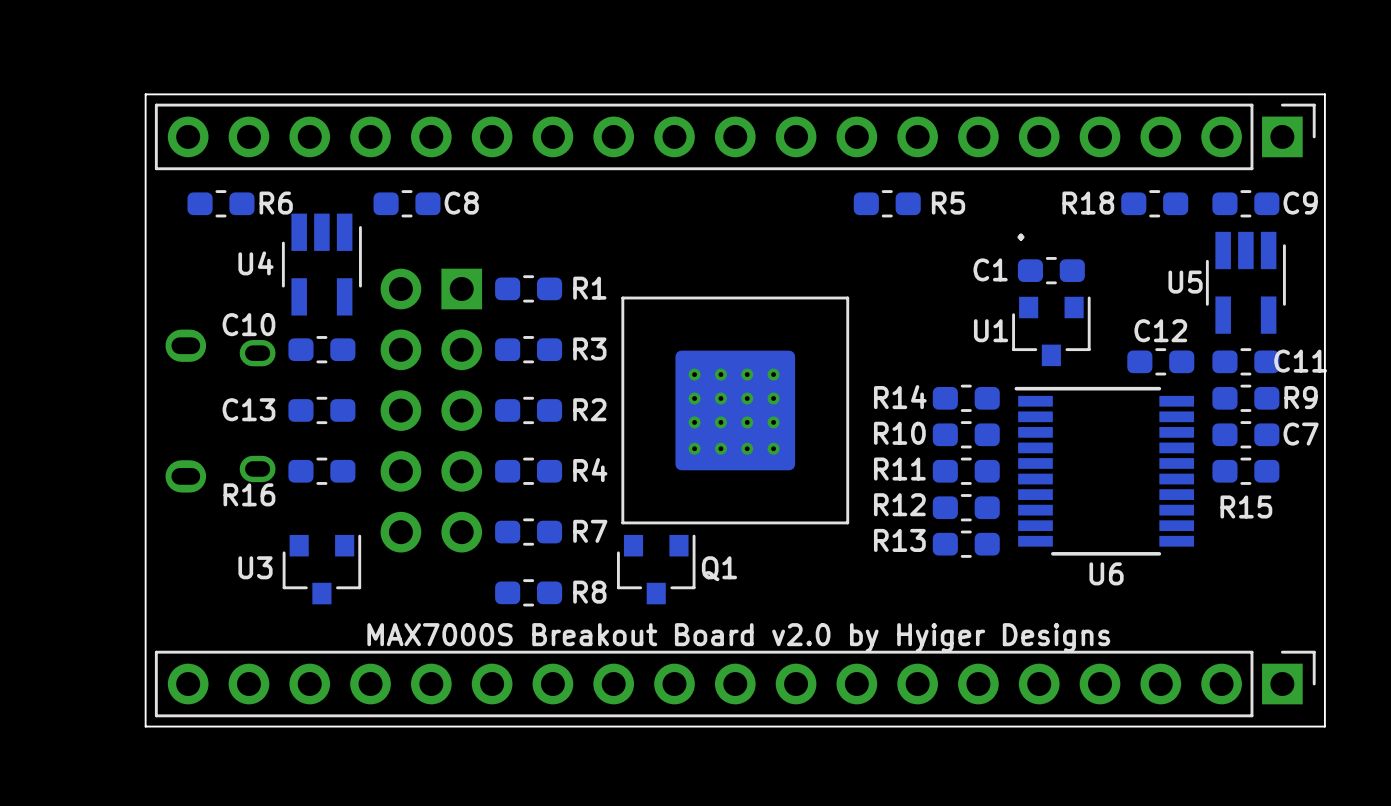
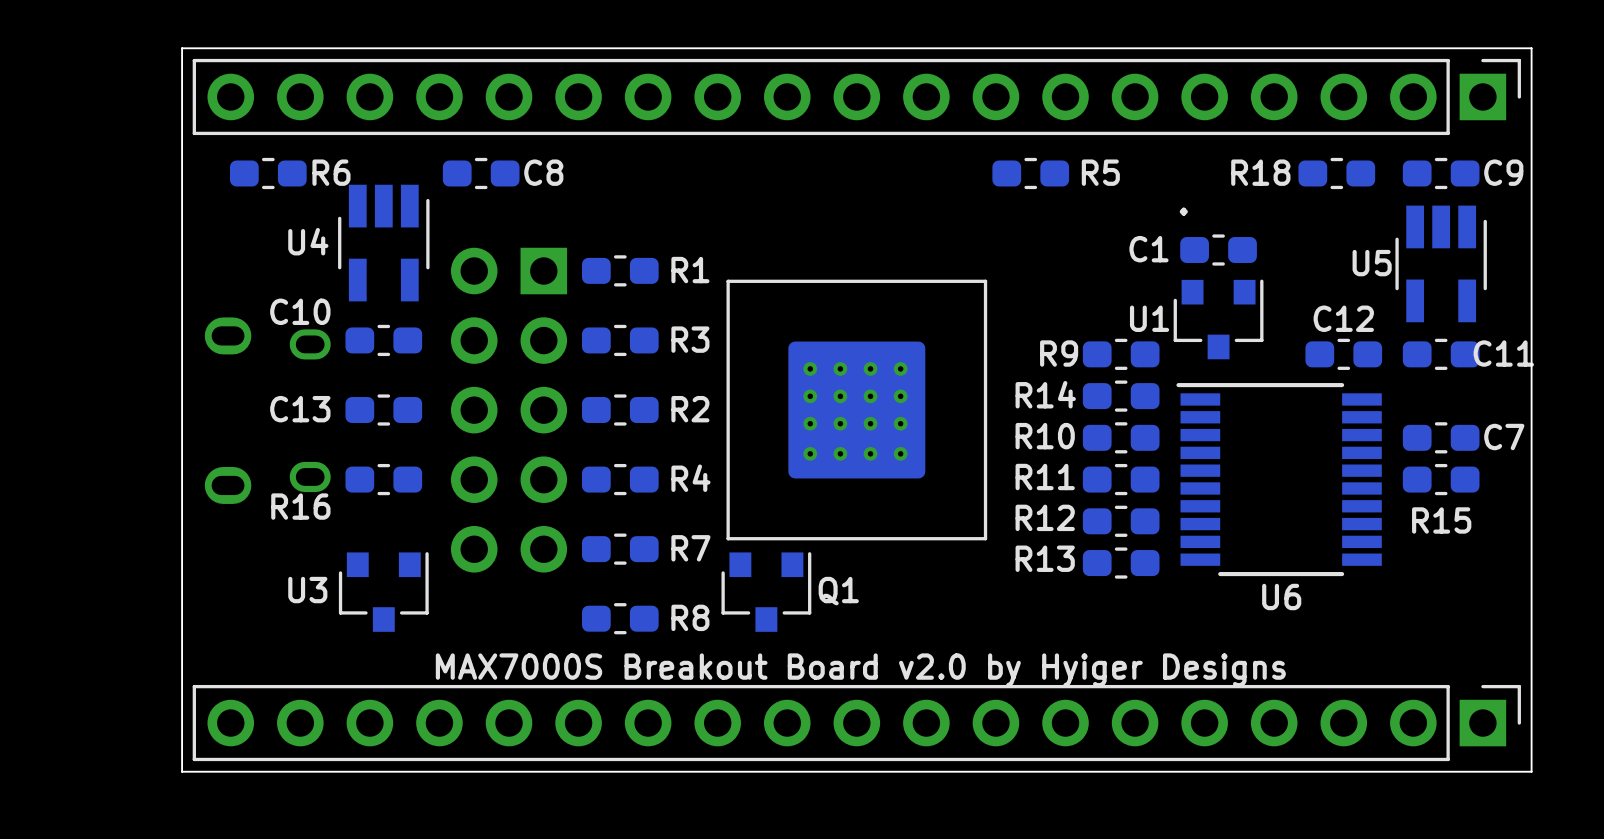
R9 name position: R9 (1301, 397) -> R9 (1059, 353)
R9 position: (1245, 398) -> (1121, 354)

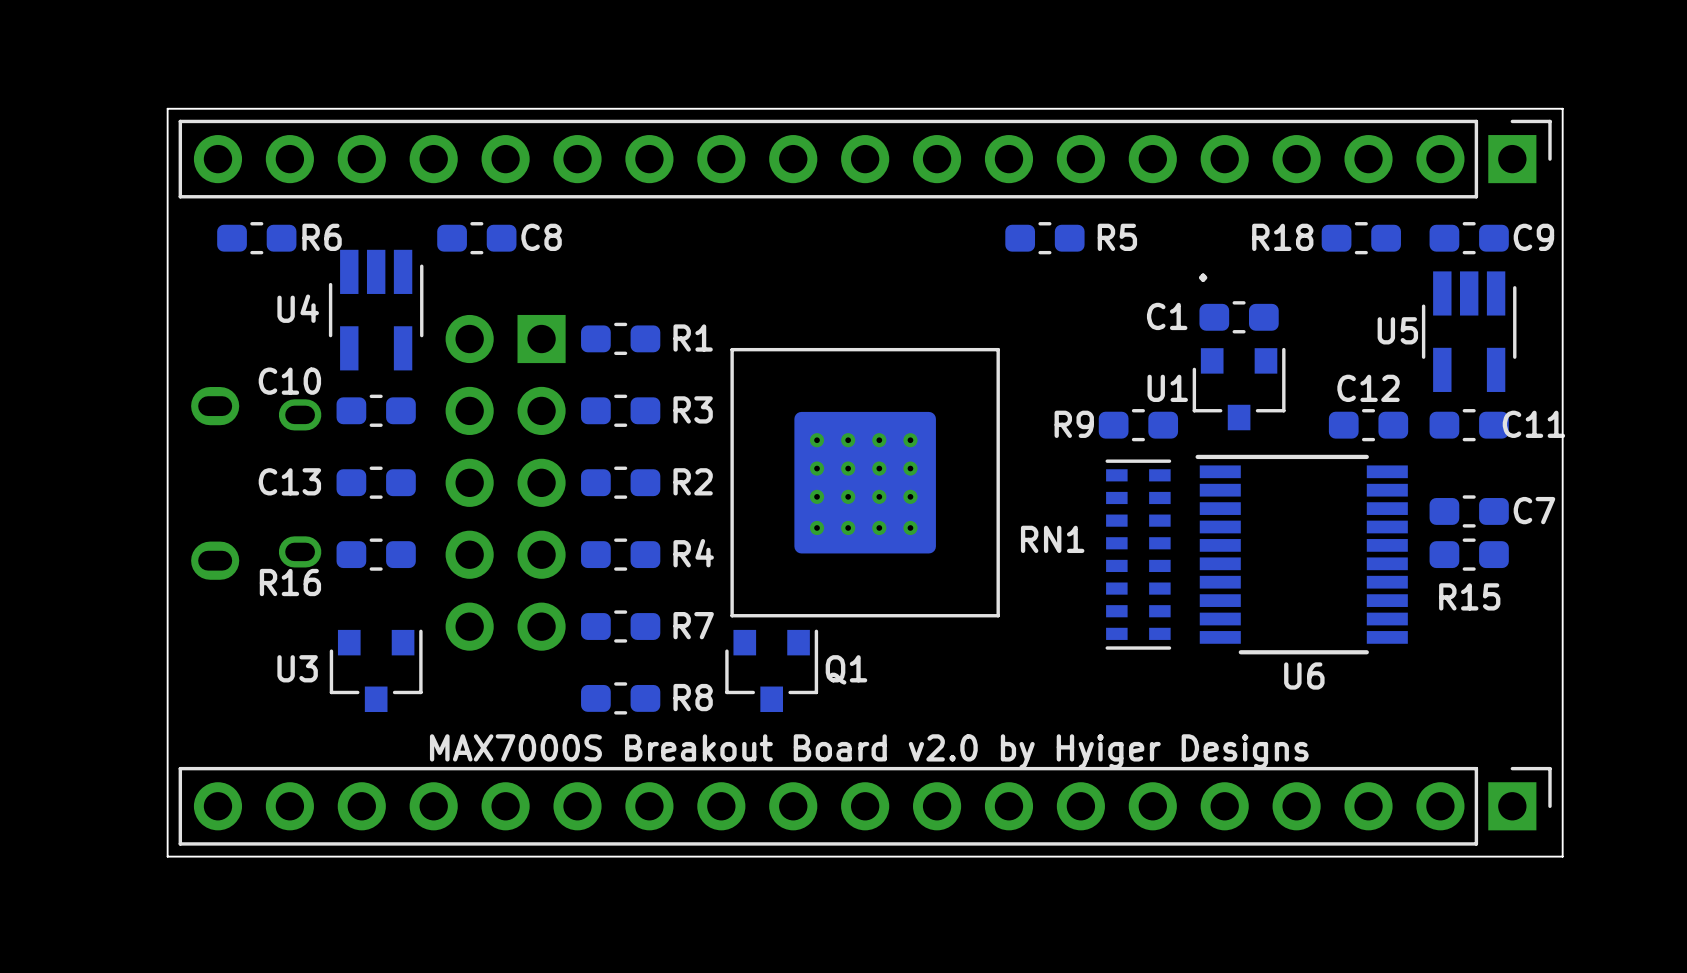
R14: (1121, 396) -> none
R10: (1121, 437) -> none
R11: (1121, 479) -> none
RN1: none -> (1138, 554)
R12: (1121, 521) -> none
R13: (1121, 563) -> none

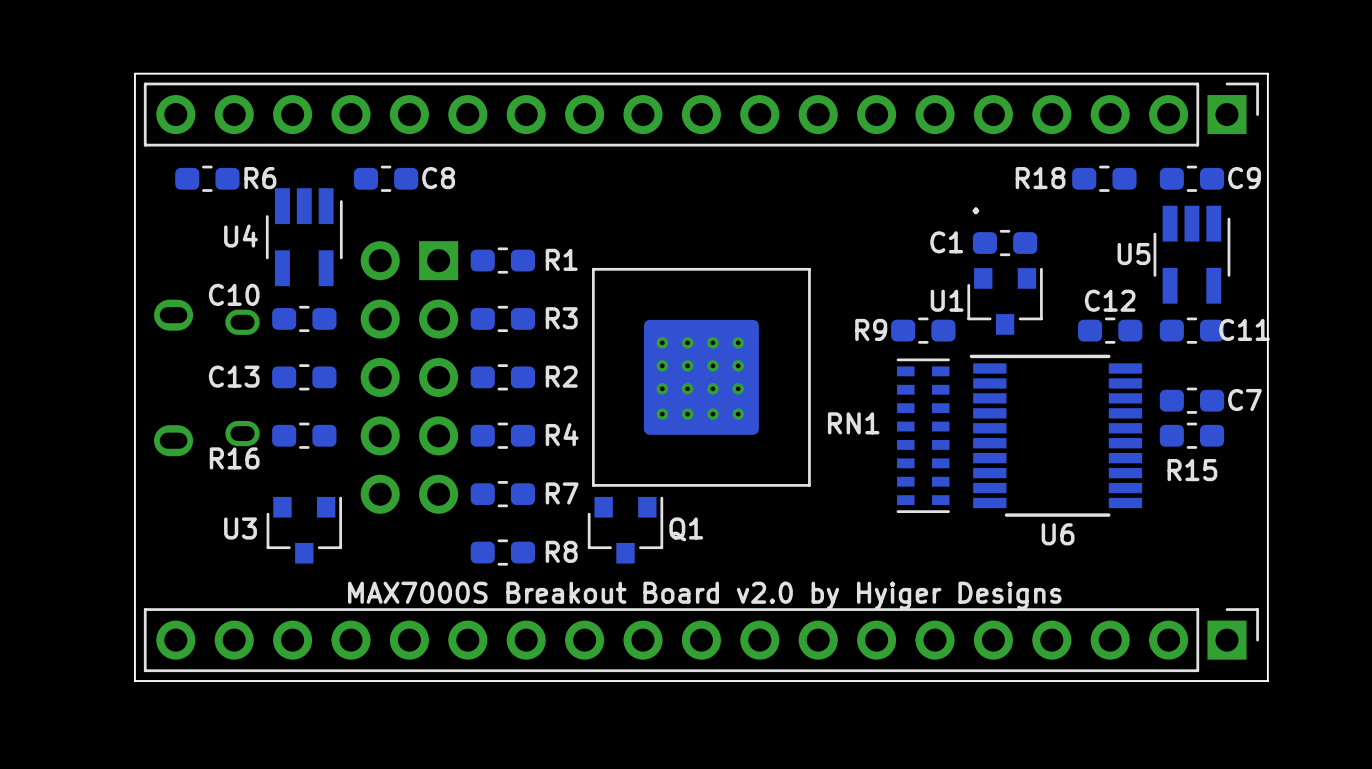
R5: (1044, 238) -> none

